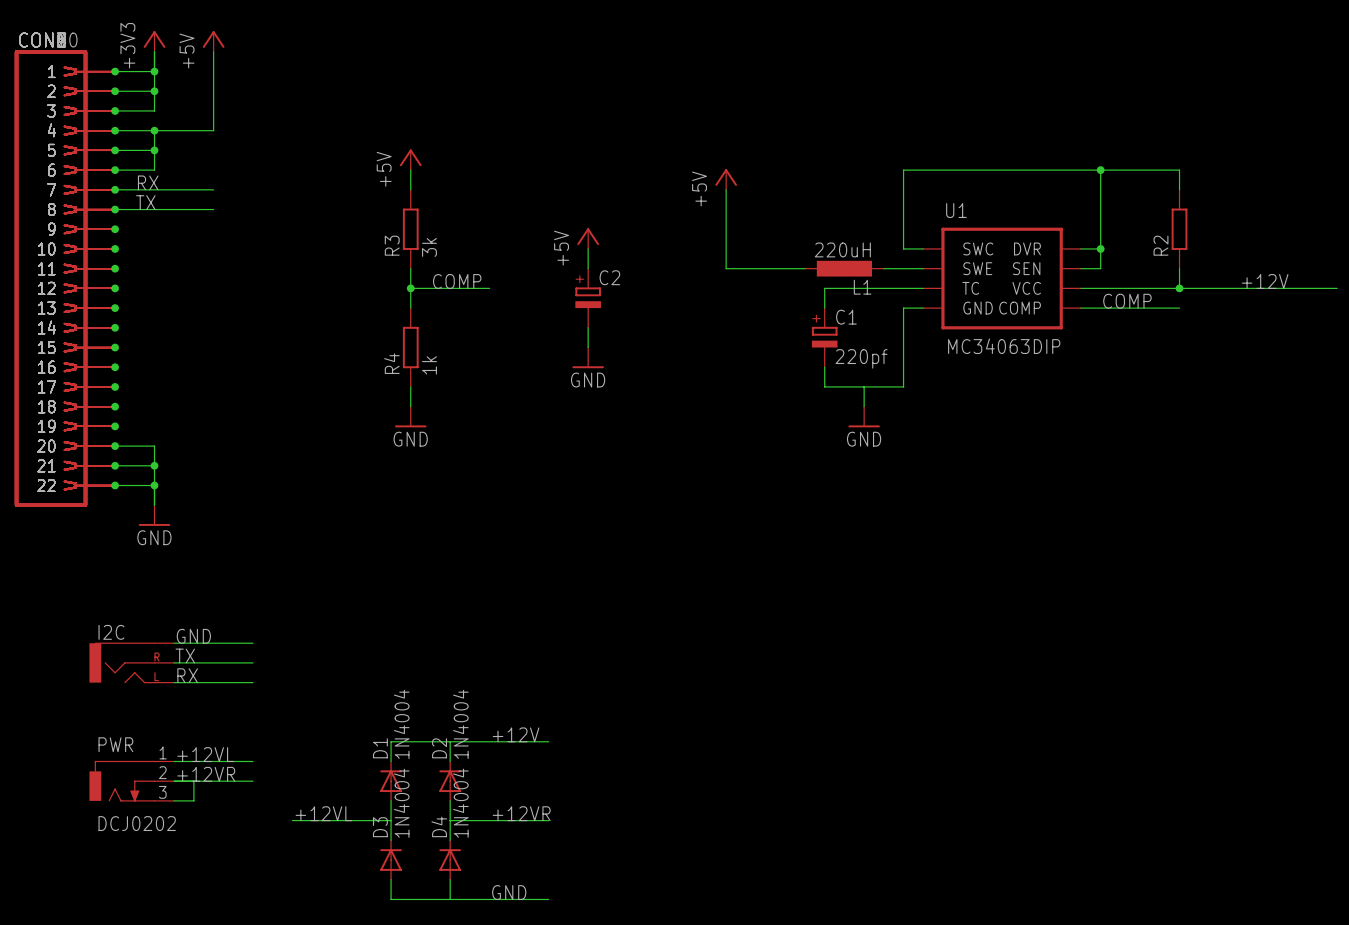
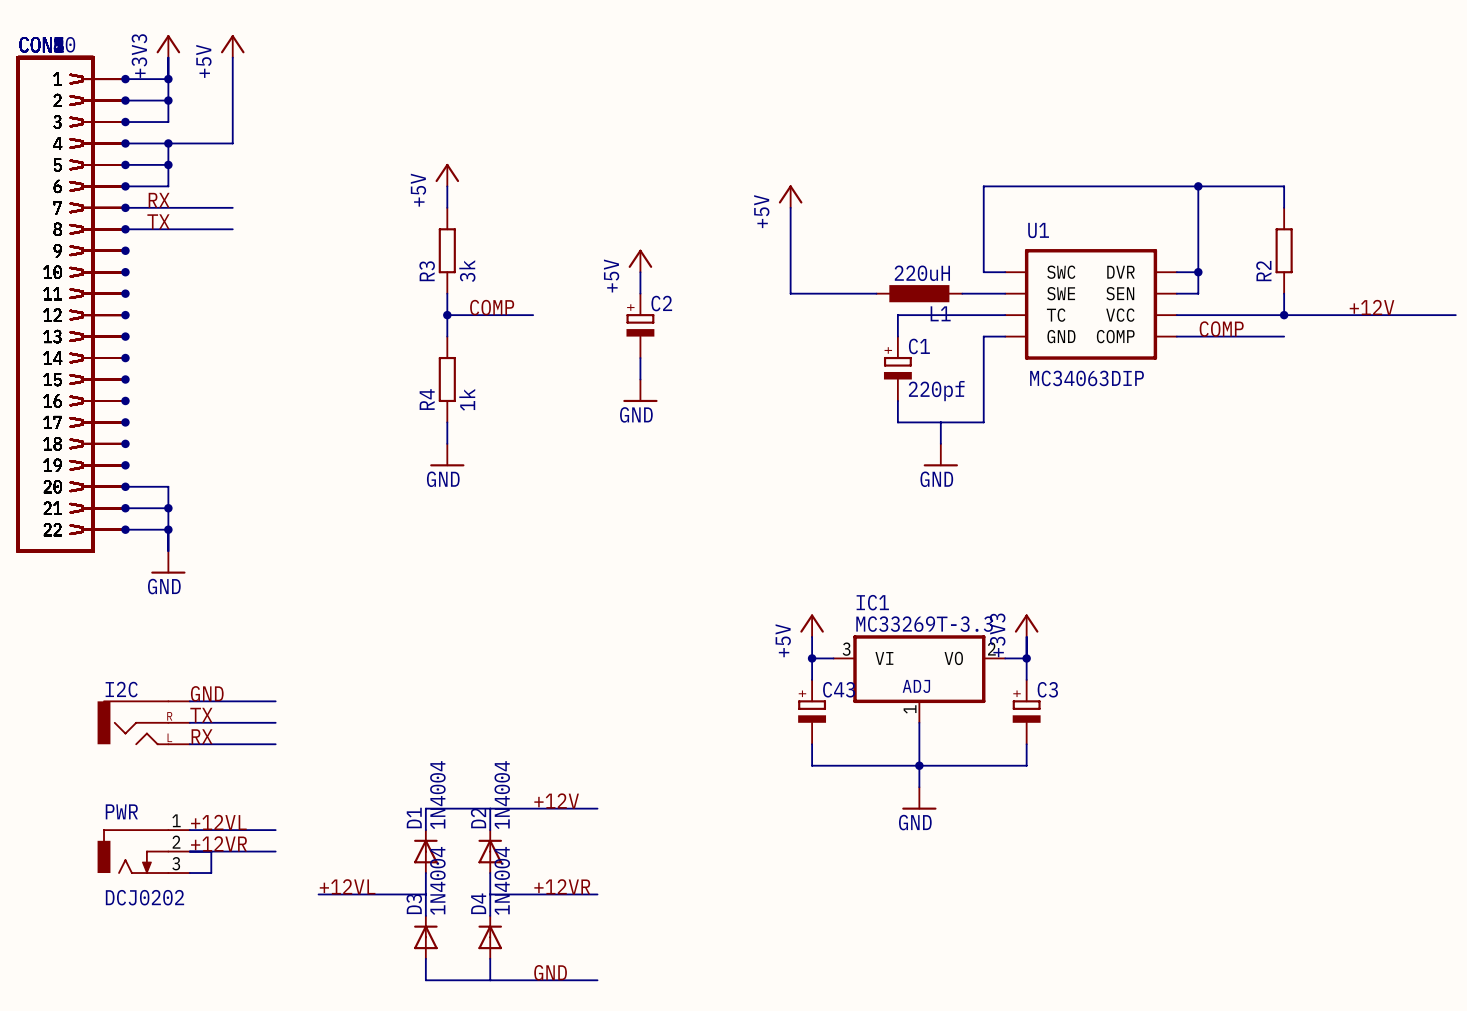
power symbol: none -> +5V (812, 625)
power symbol: none -> +3V3 (1026, 625)
wire: none -> (812, 636) (812, 679)
wire: none -> (1026, 636) (1026, 679)
wire: none -> (812, 658) (833, 658)
junction: none -> (812, 658)
wire: none -> (1005, 658) (1026, 658)
junction: none -> (1026, 658)
IC1: none -> MC33269T-3.3 (919, 679)
C43: none -> (812, 712)
C3: none -> (1026, 712)
wire: none -> (919, 722) (919, 787)
wire: none -> (812, 744) (812, 765) (1026, 765) (1026, 744)
junction: none -> (919, 765)
power symbol: none -> GND (919, 798)

